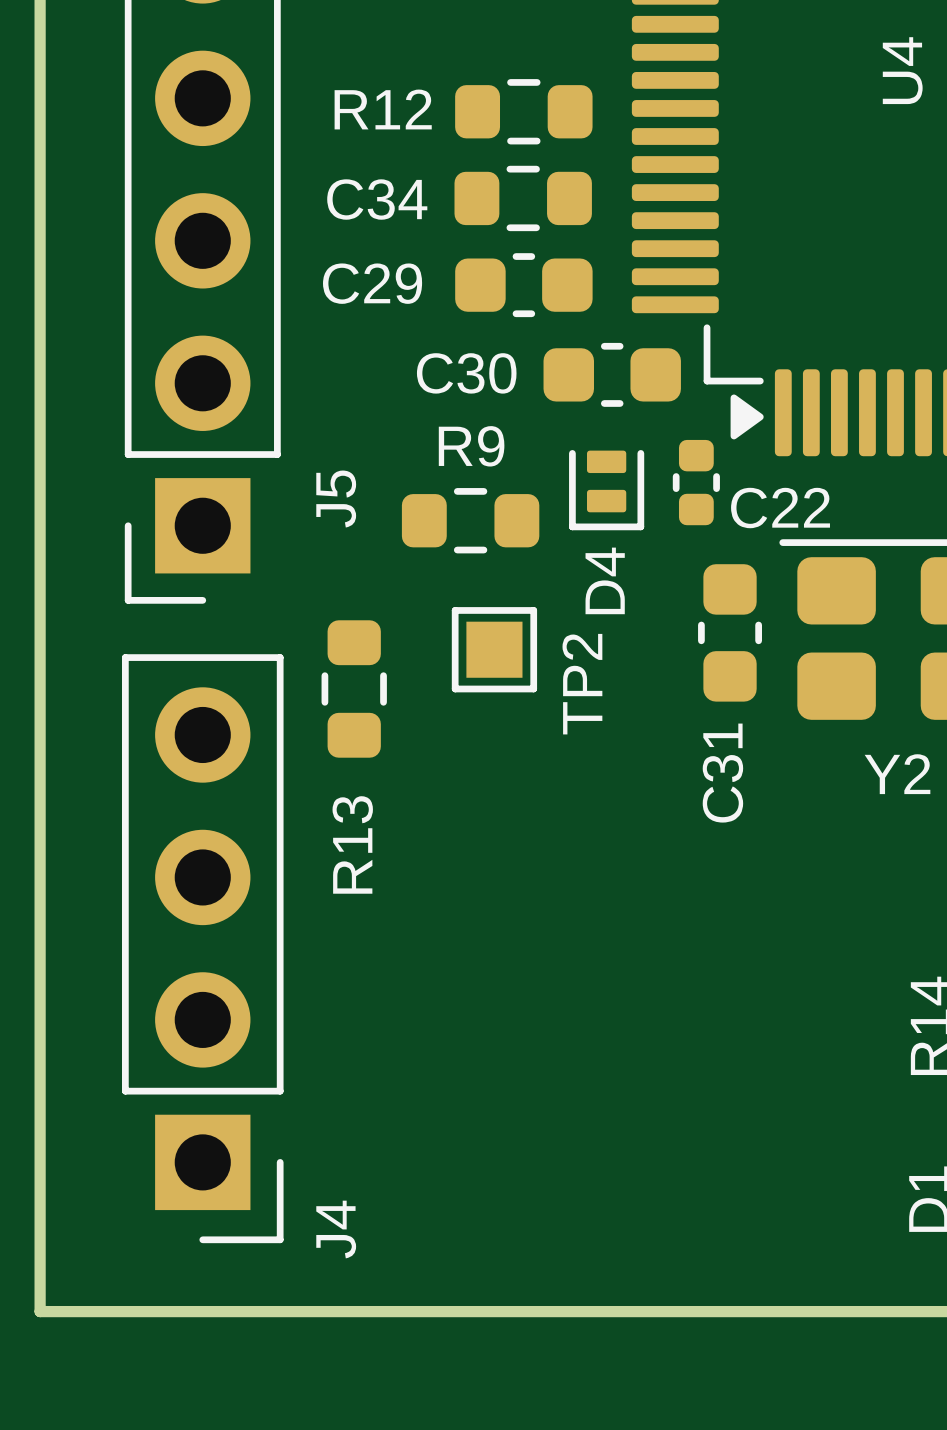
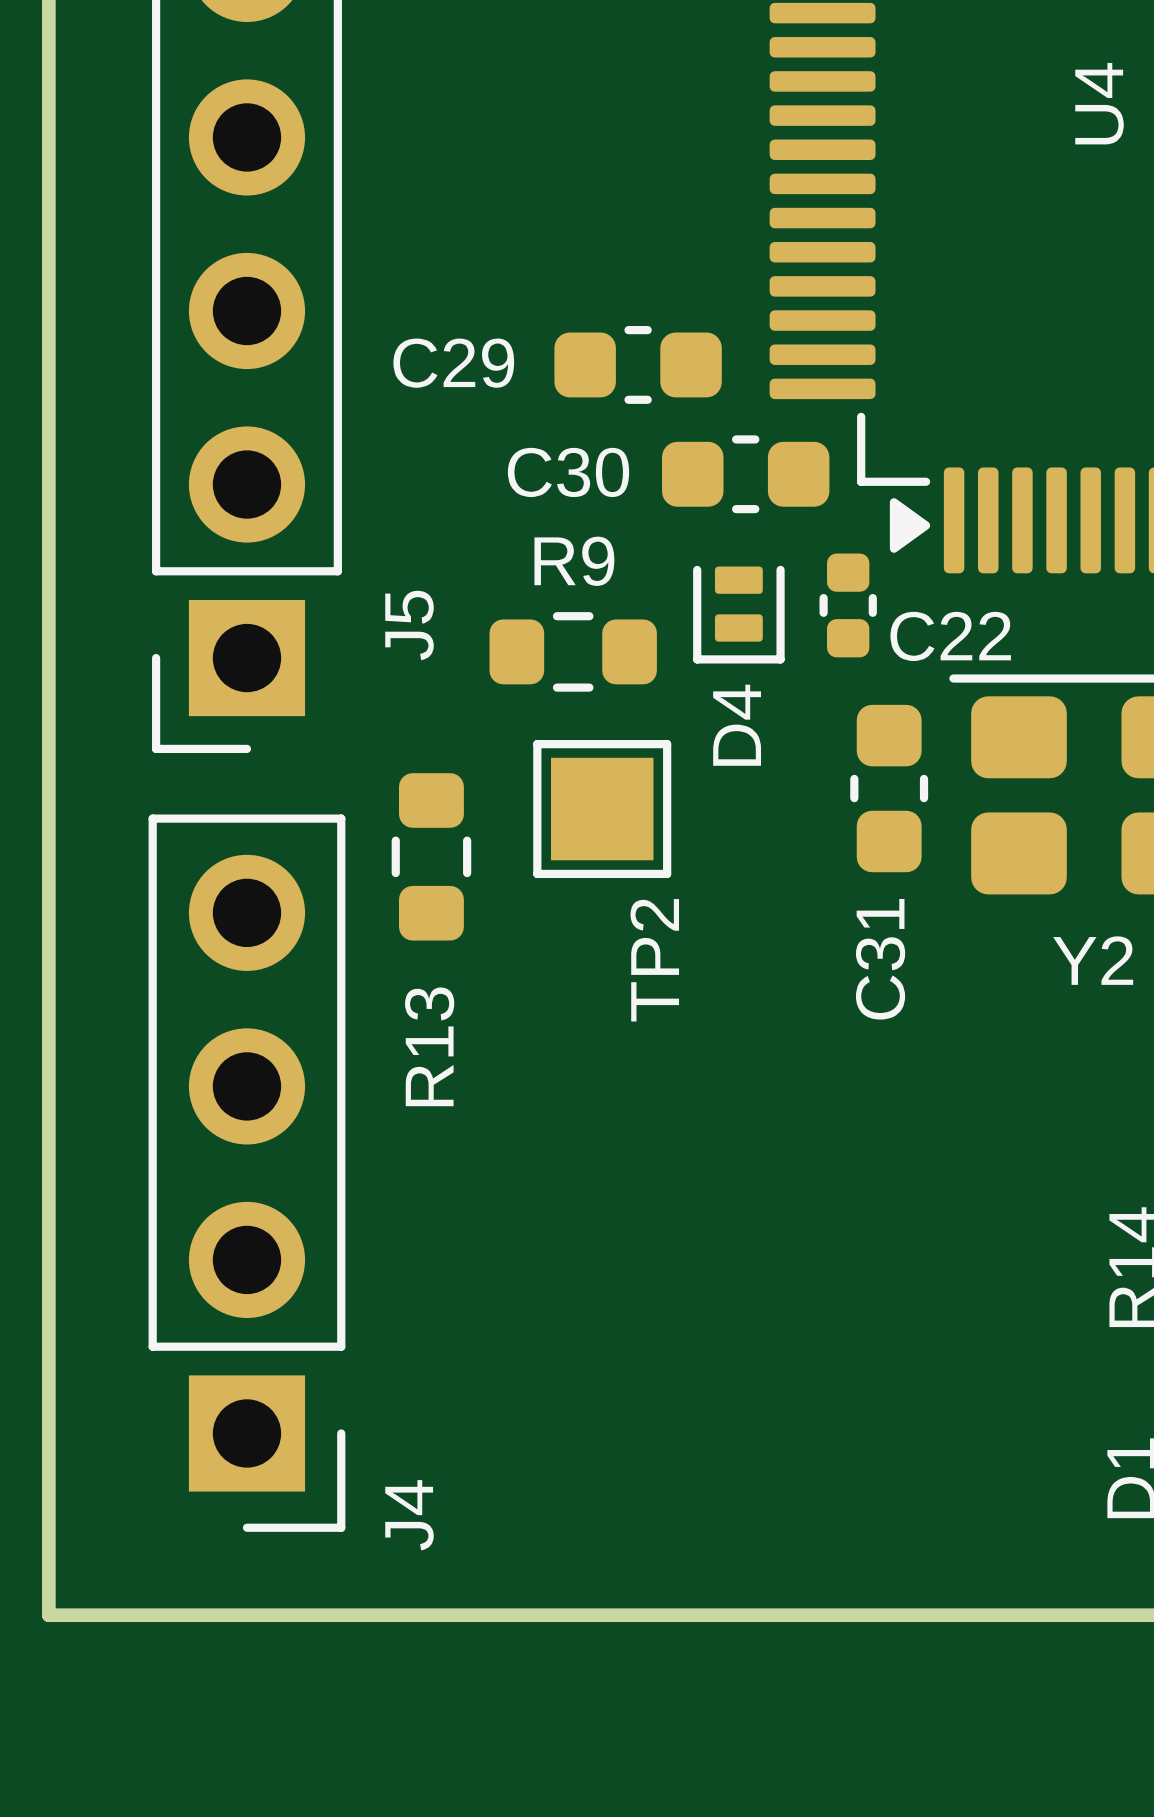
R12: (523, 111) -> none
C34: (523, 198) -> none
TP2 footprint: [451, 607, 538, 693] -> [533, 740, 672, 879]
TP2 name position: TP2 (582, 684) -> TP2 (654, 960)

